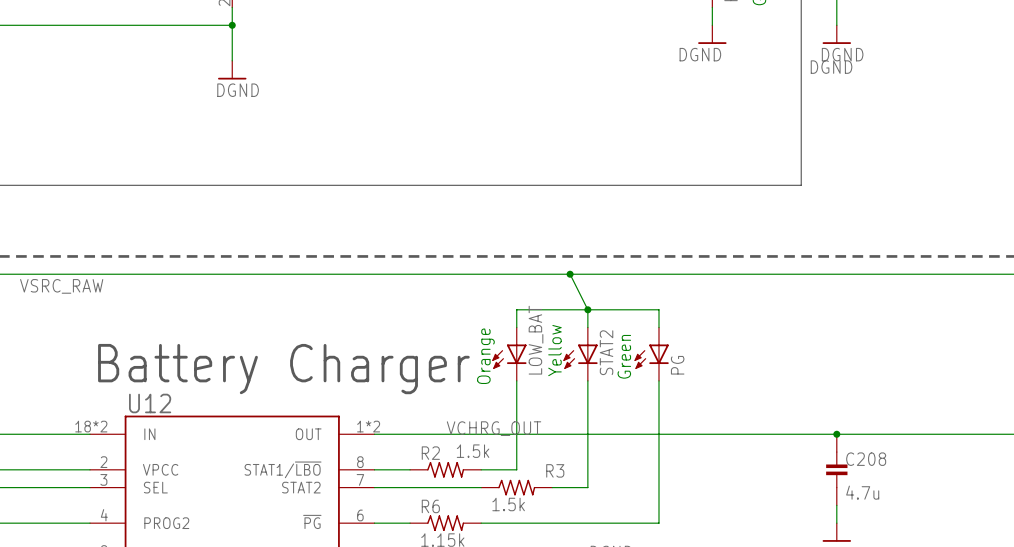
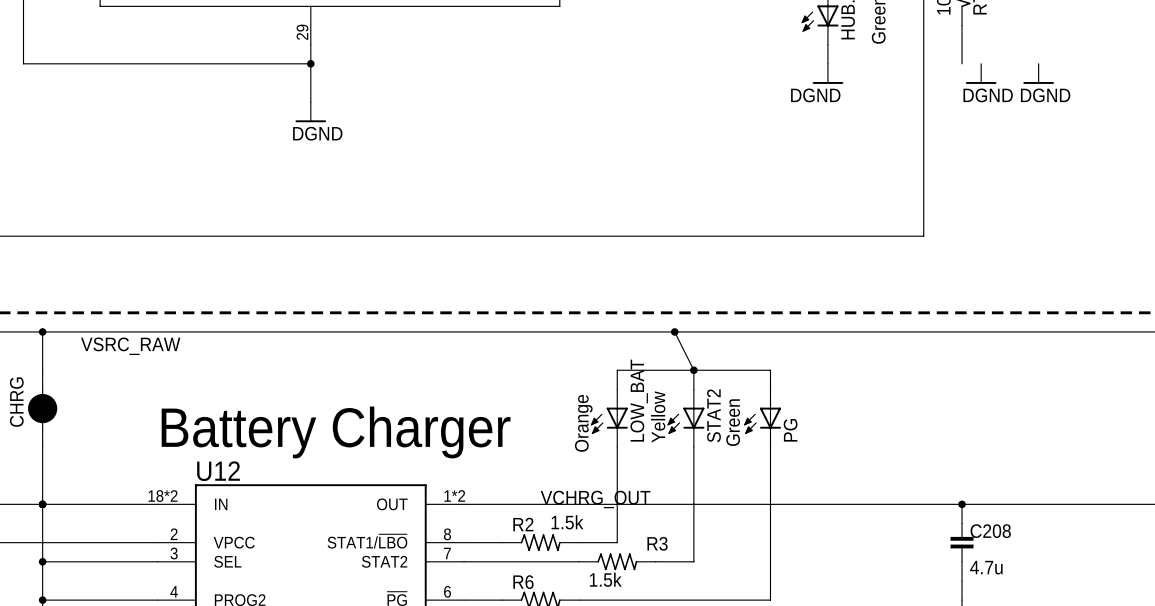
power symbol position: (836, 34) -> (981, 73)
power symbol: none -> (1038, 73)
label: DGND (842, 54) -> none
label: none -> DGND (988, 95)
label: none -> DGND (1045, 95)
label: DGND (831, 67) -> none

